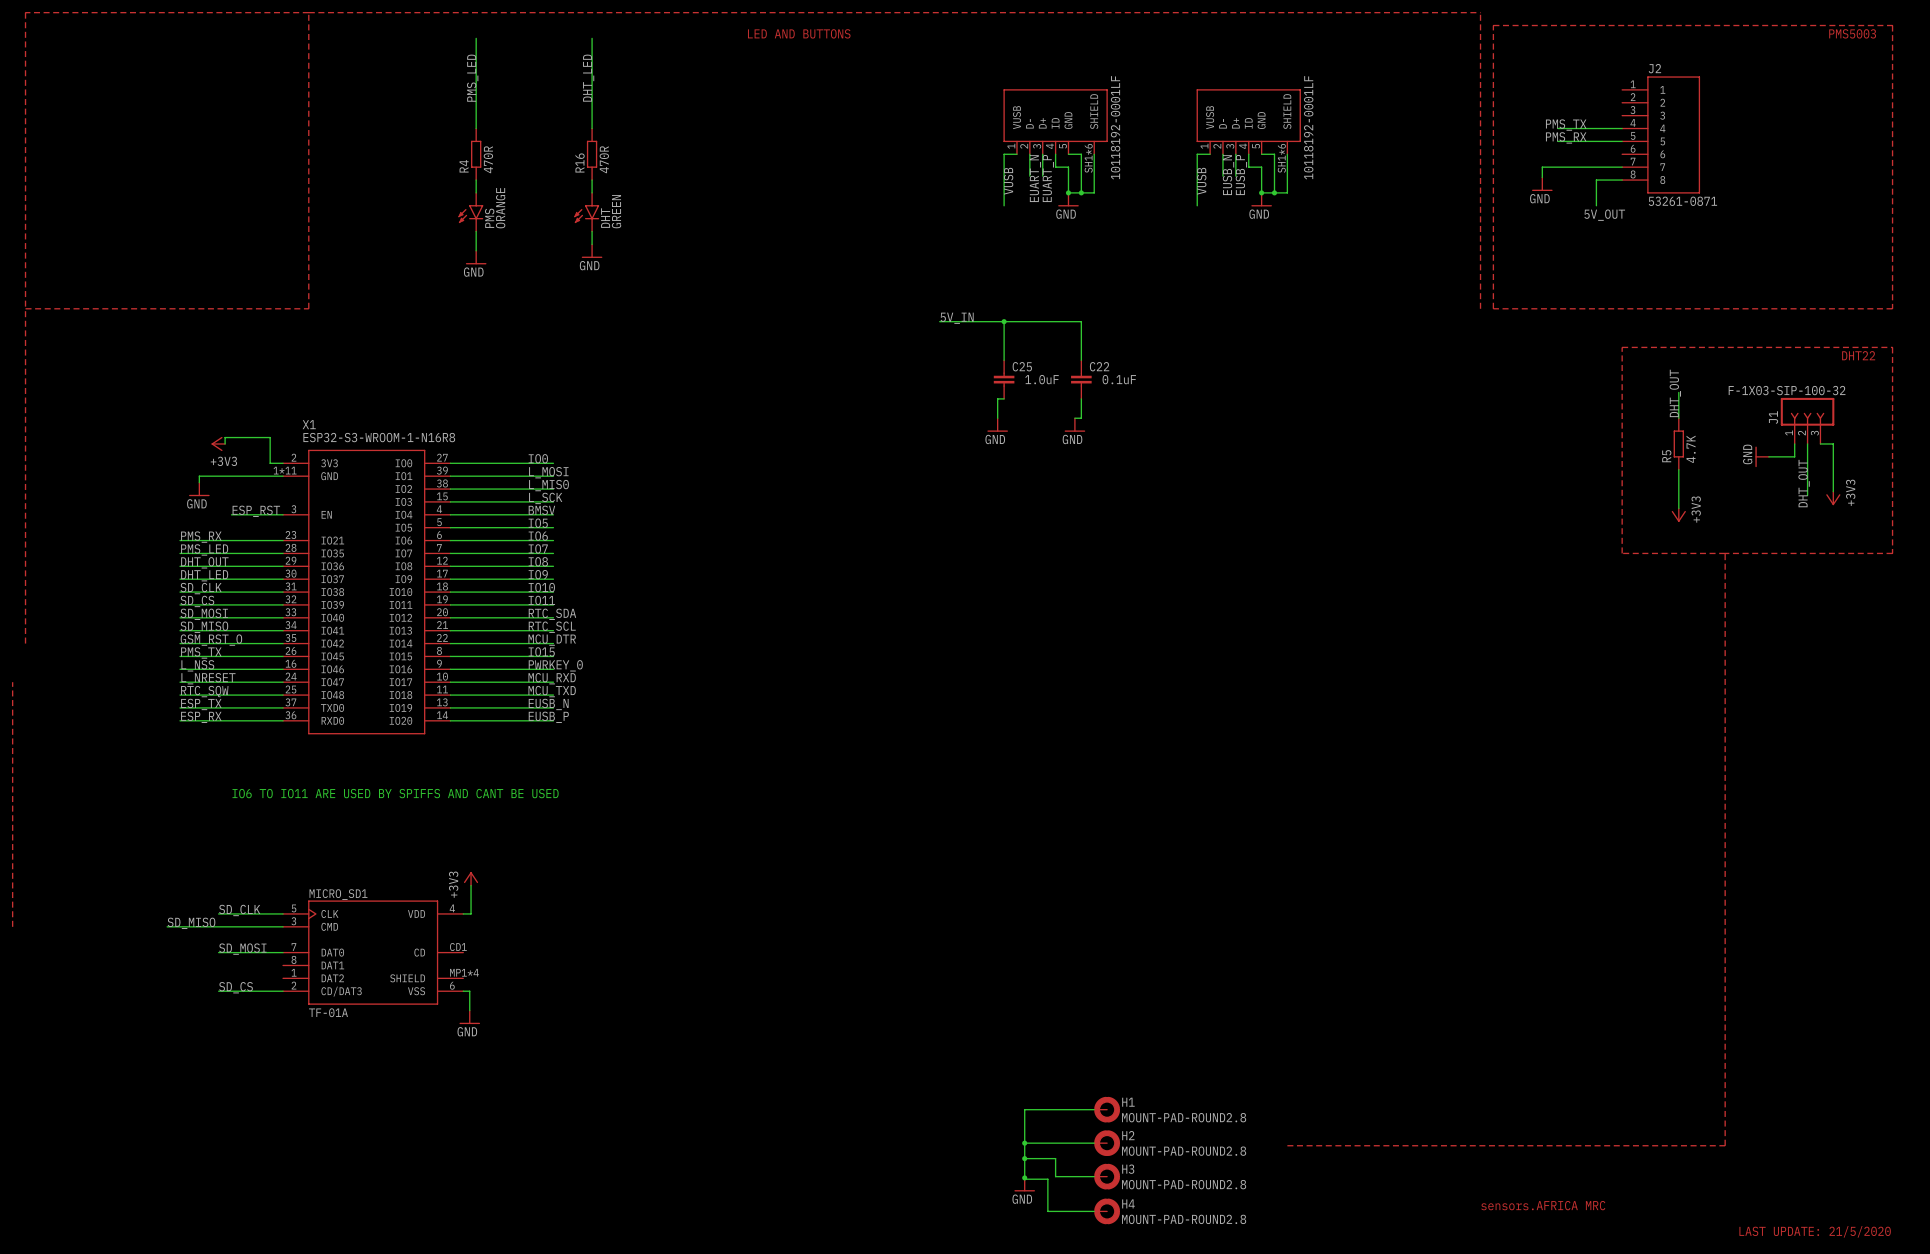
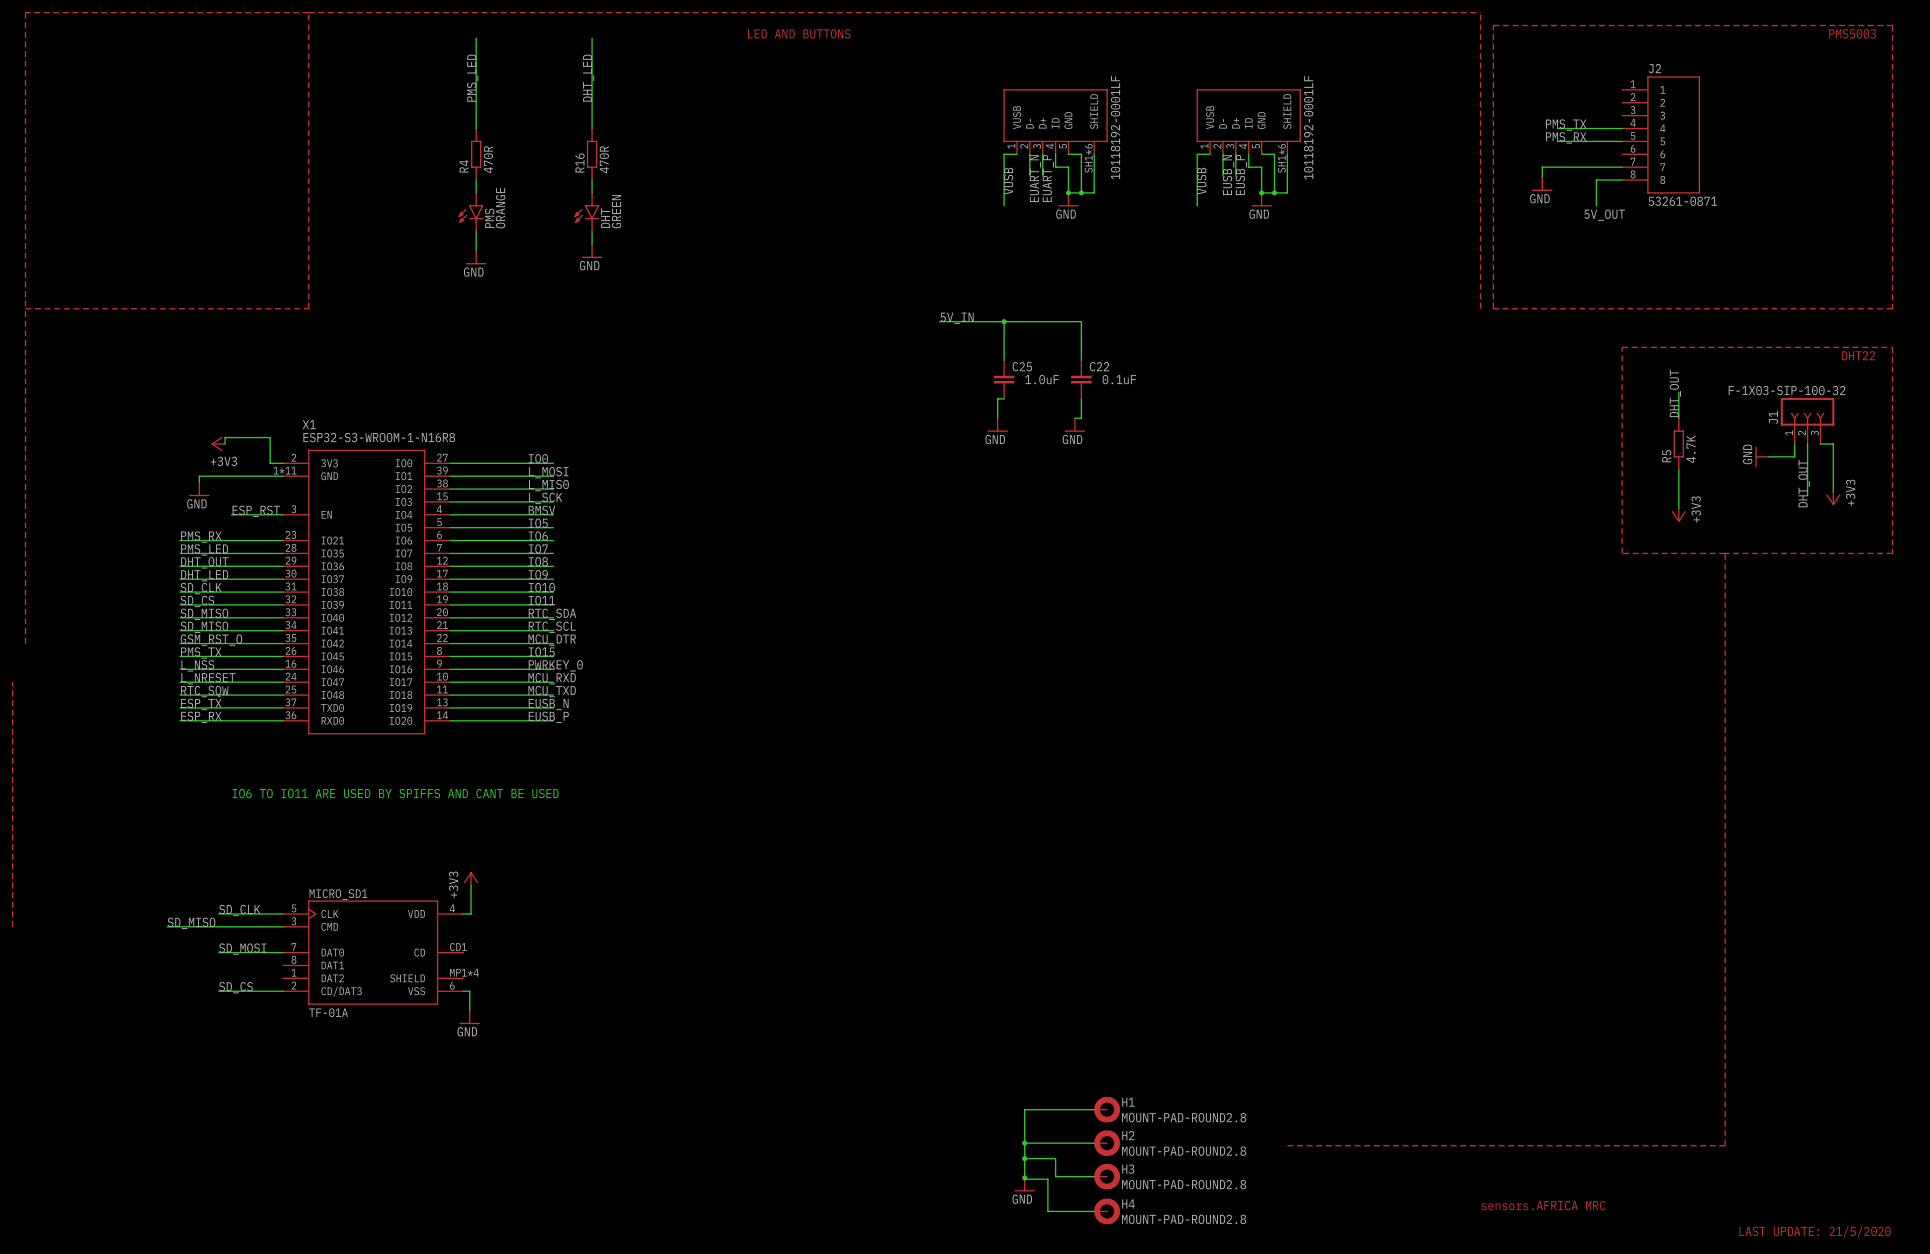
label: SD_MOSI (204, 614) -> SD_MISO (204, 614)

